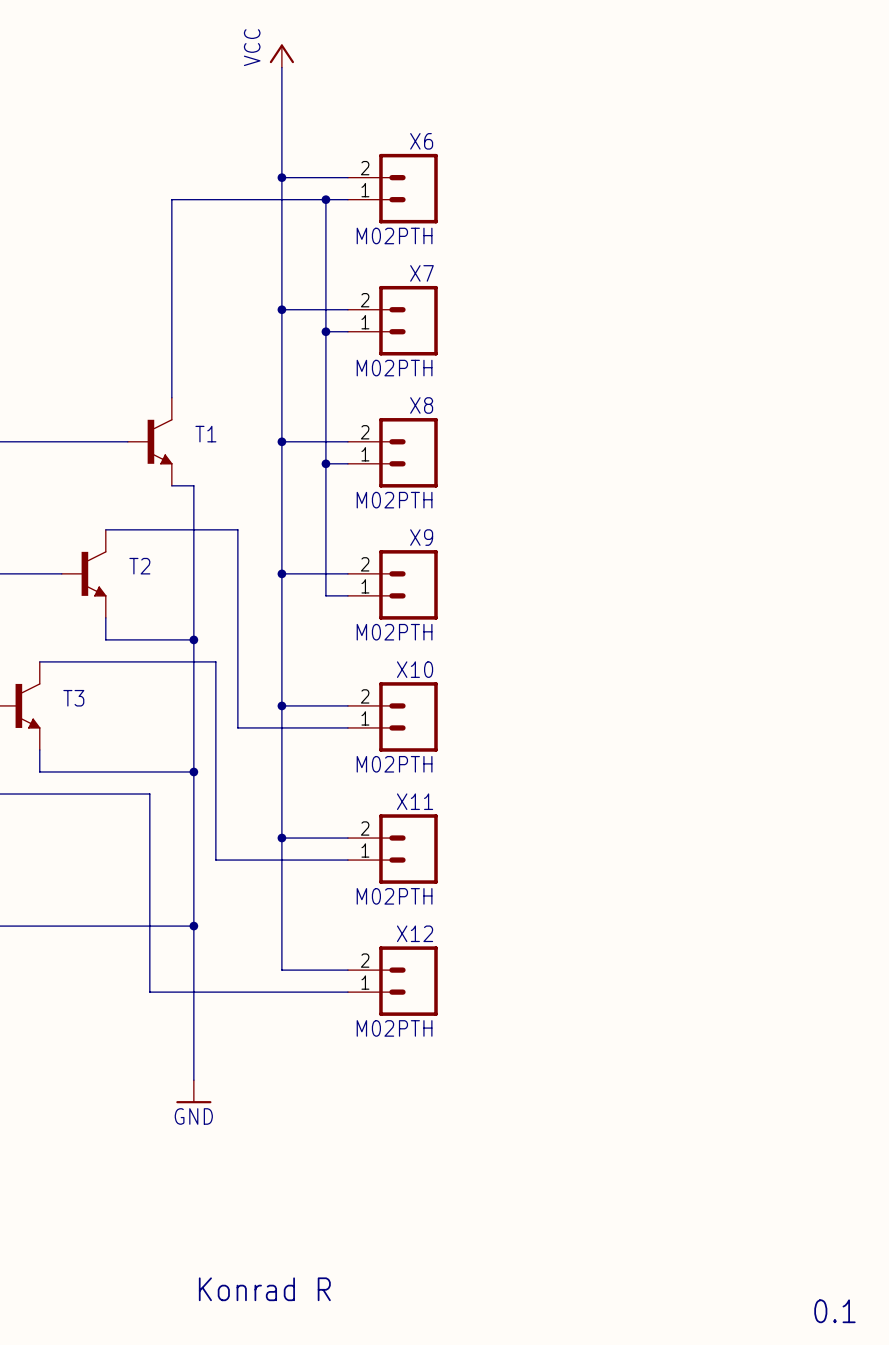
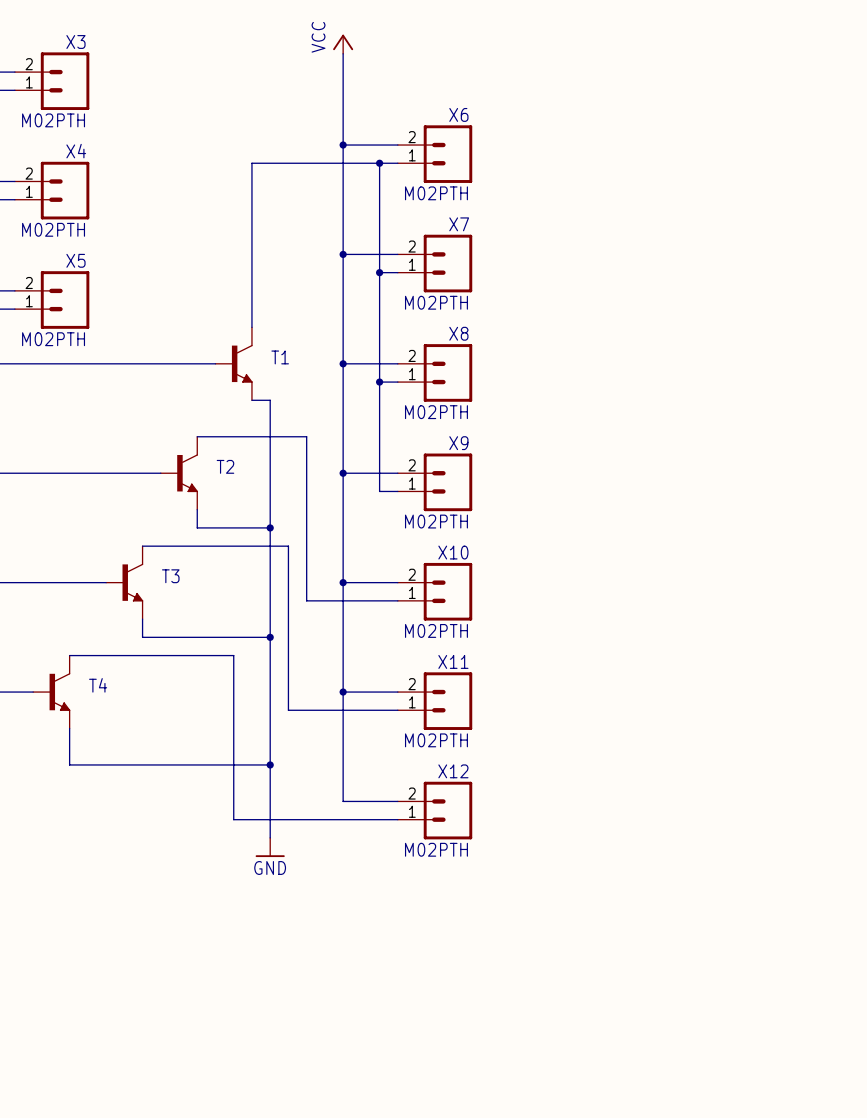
wire: (193, 1014) (193, 1080) -> none
power symbol position: GND (193, 1091) -> GND (270, 847)
text: Konrad R (264, 1289) -> none
text: 0.1 (834, 1311) -> none

